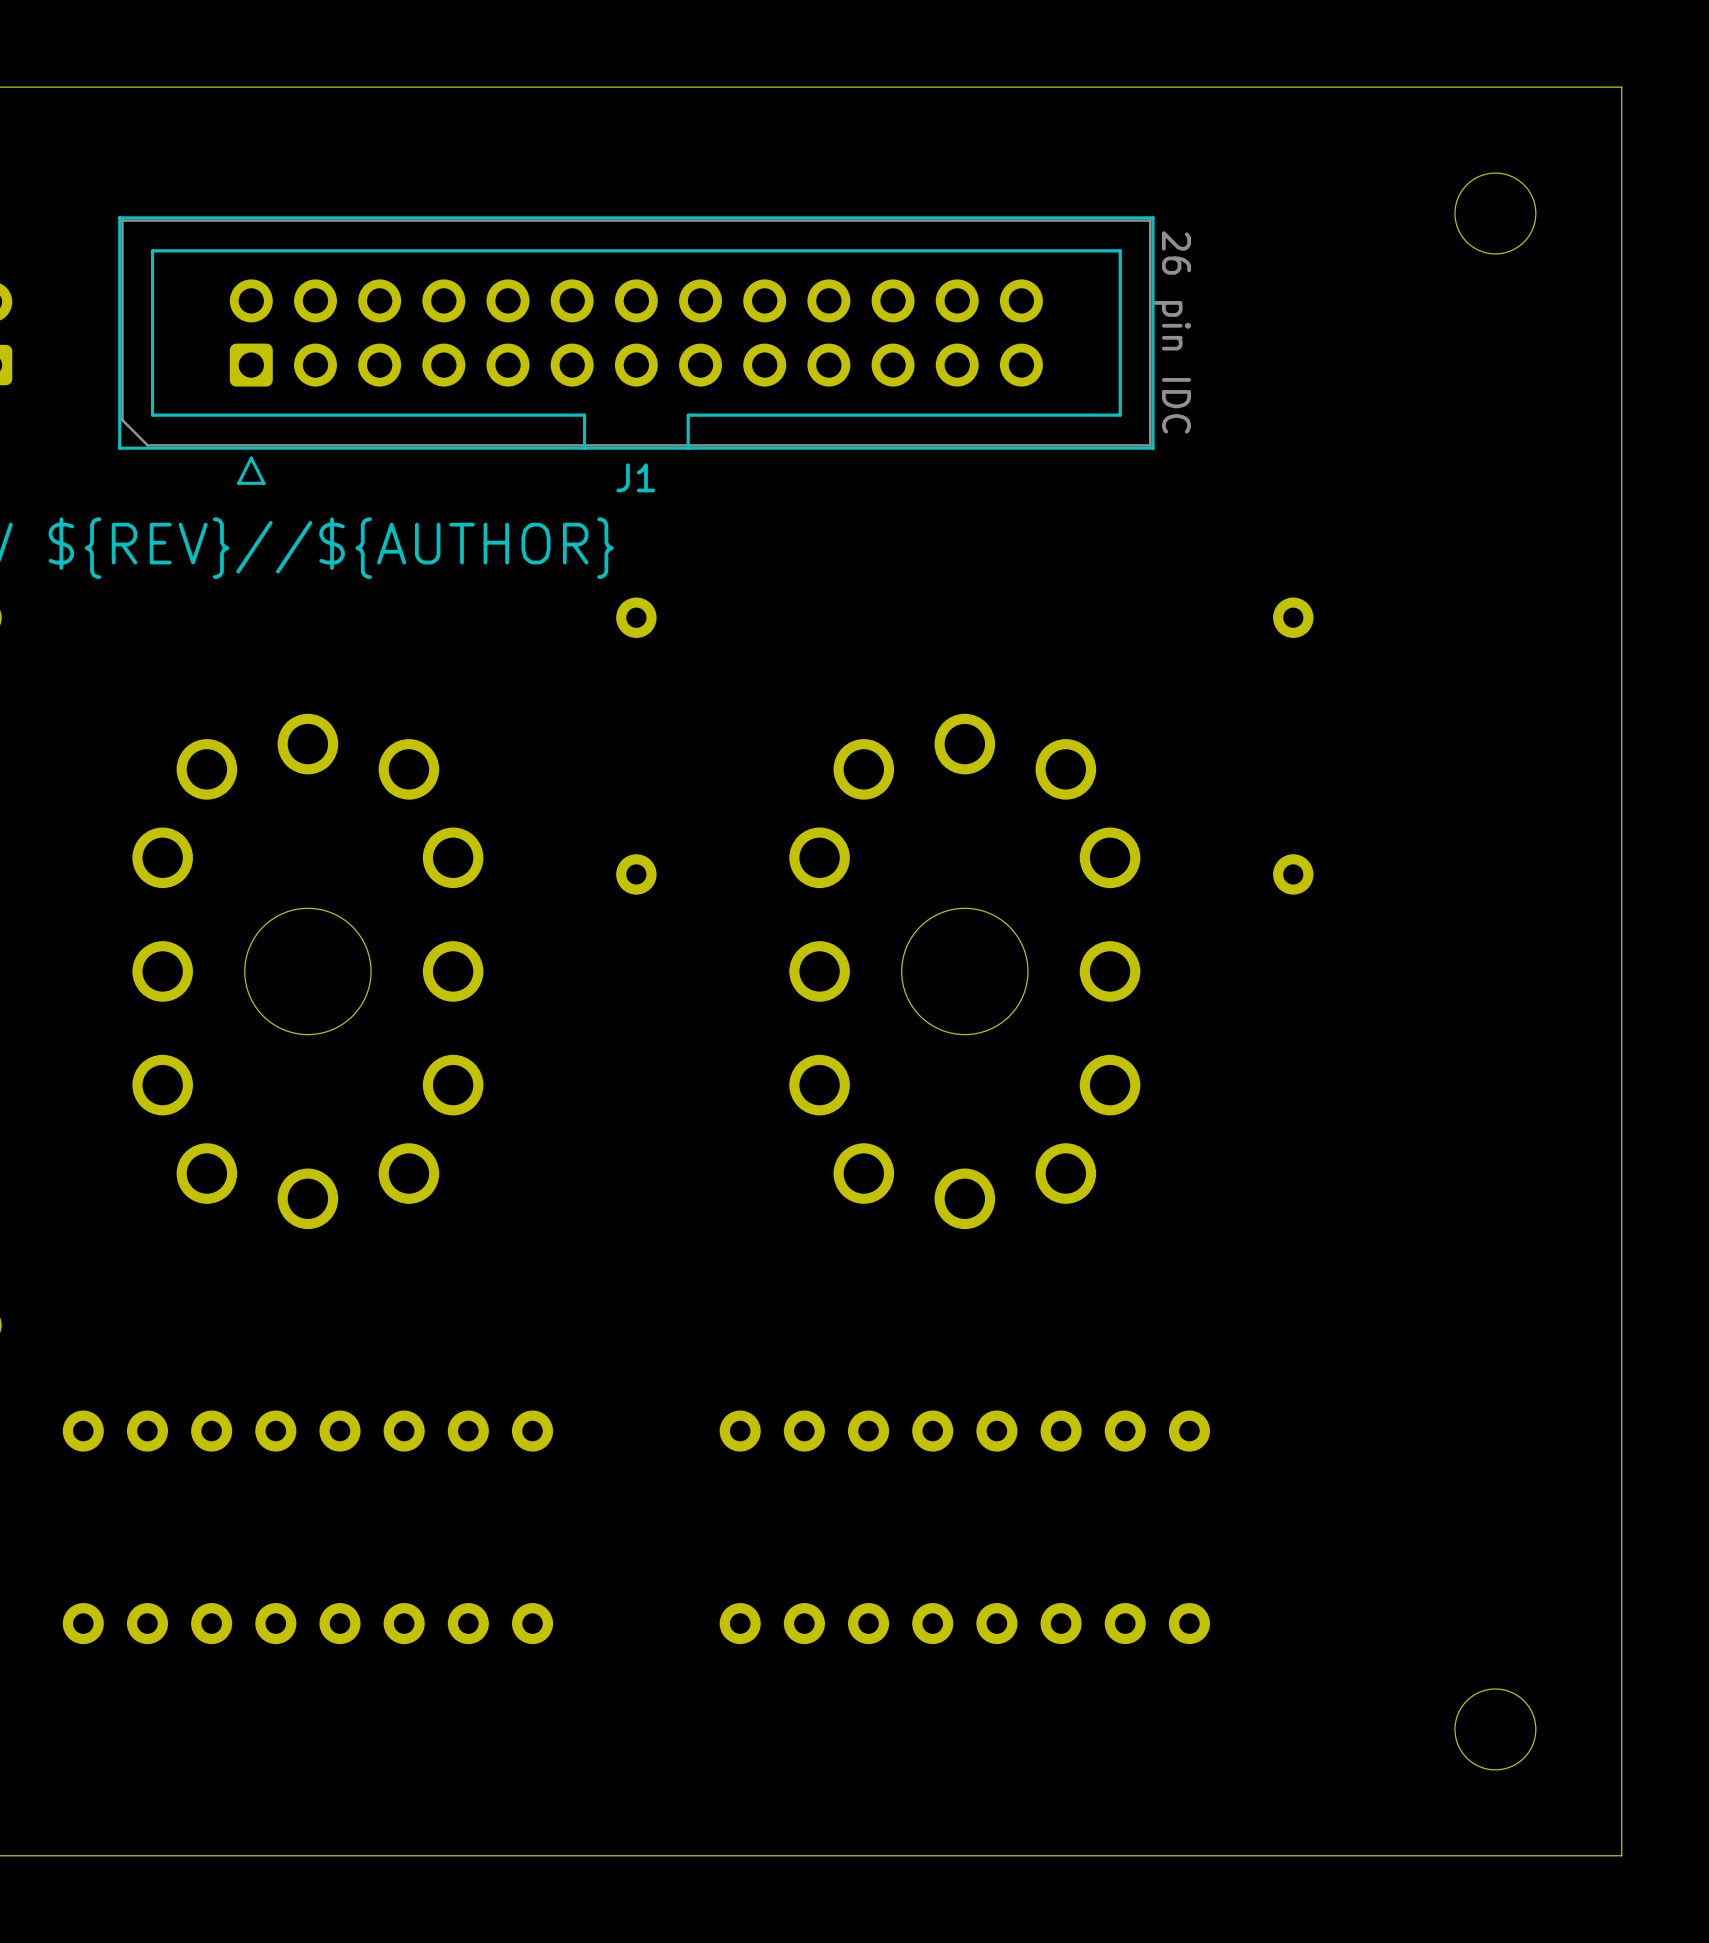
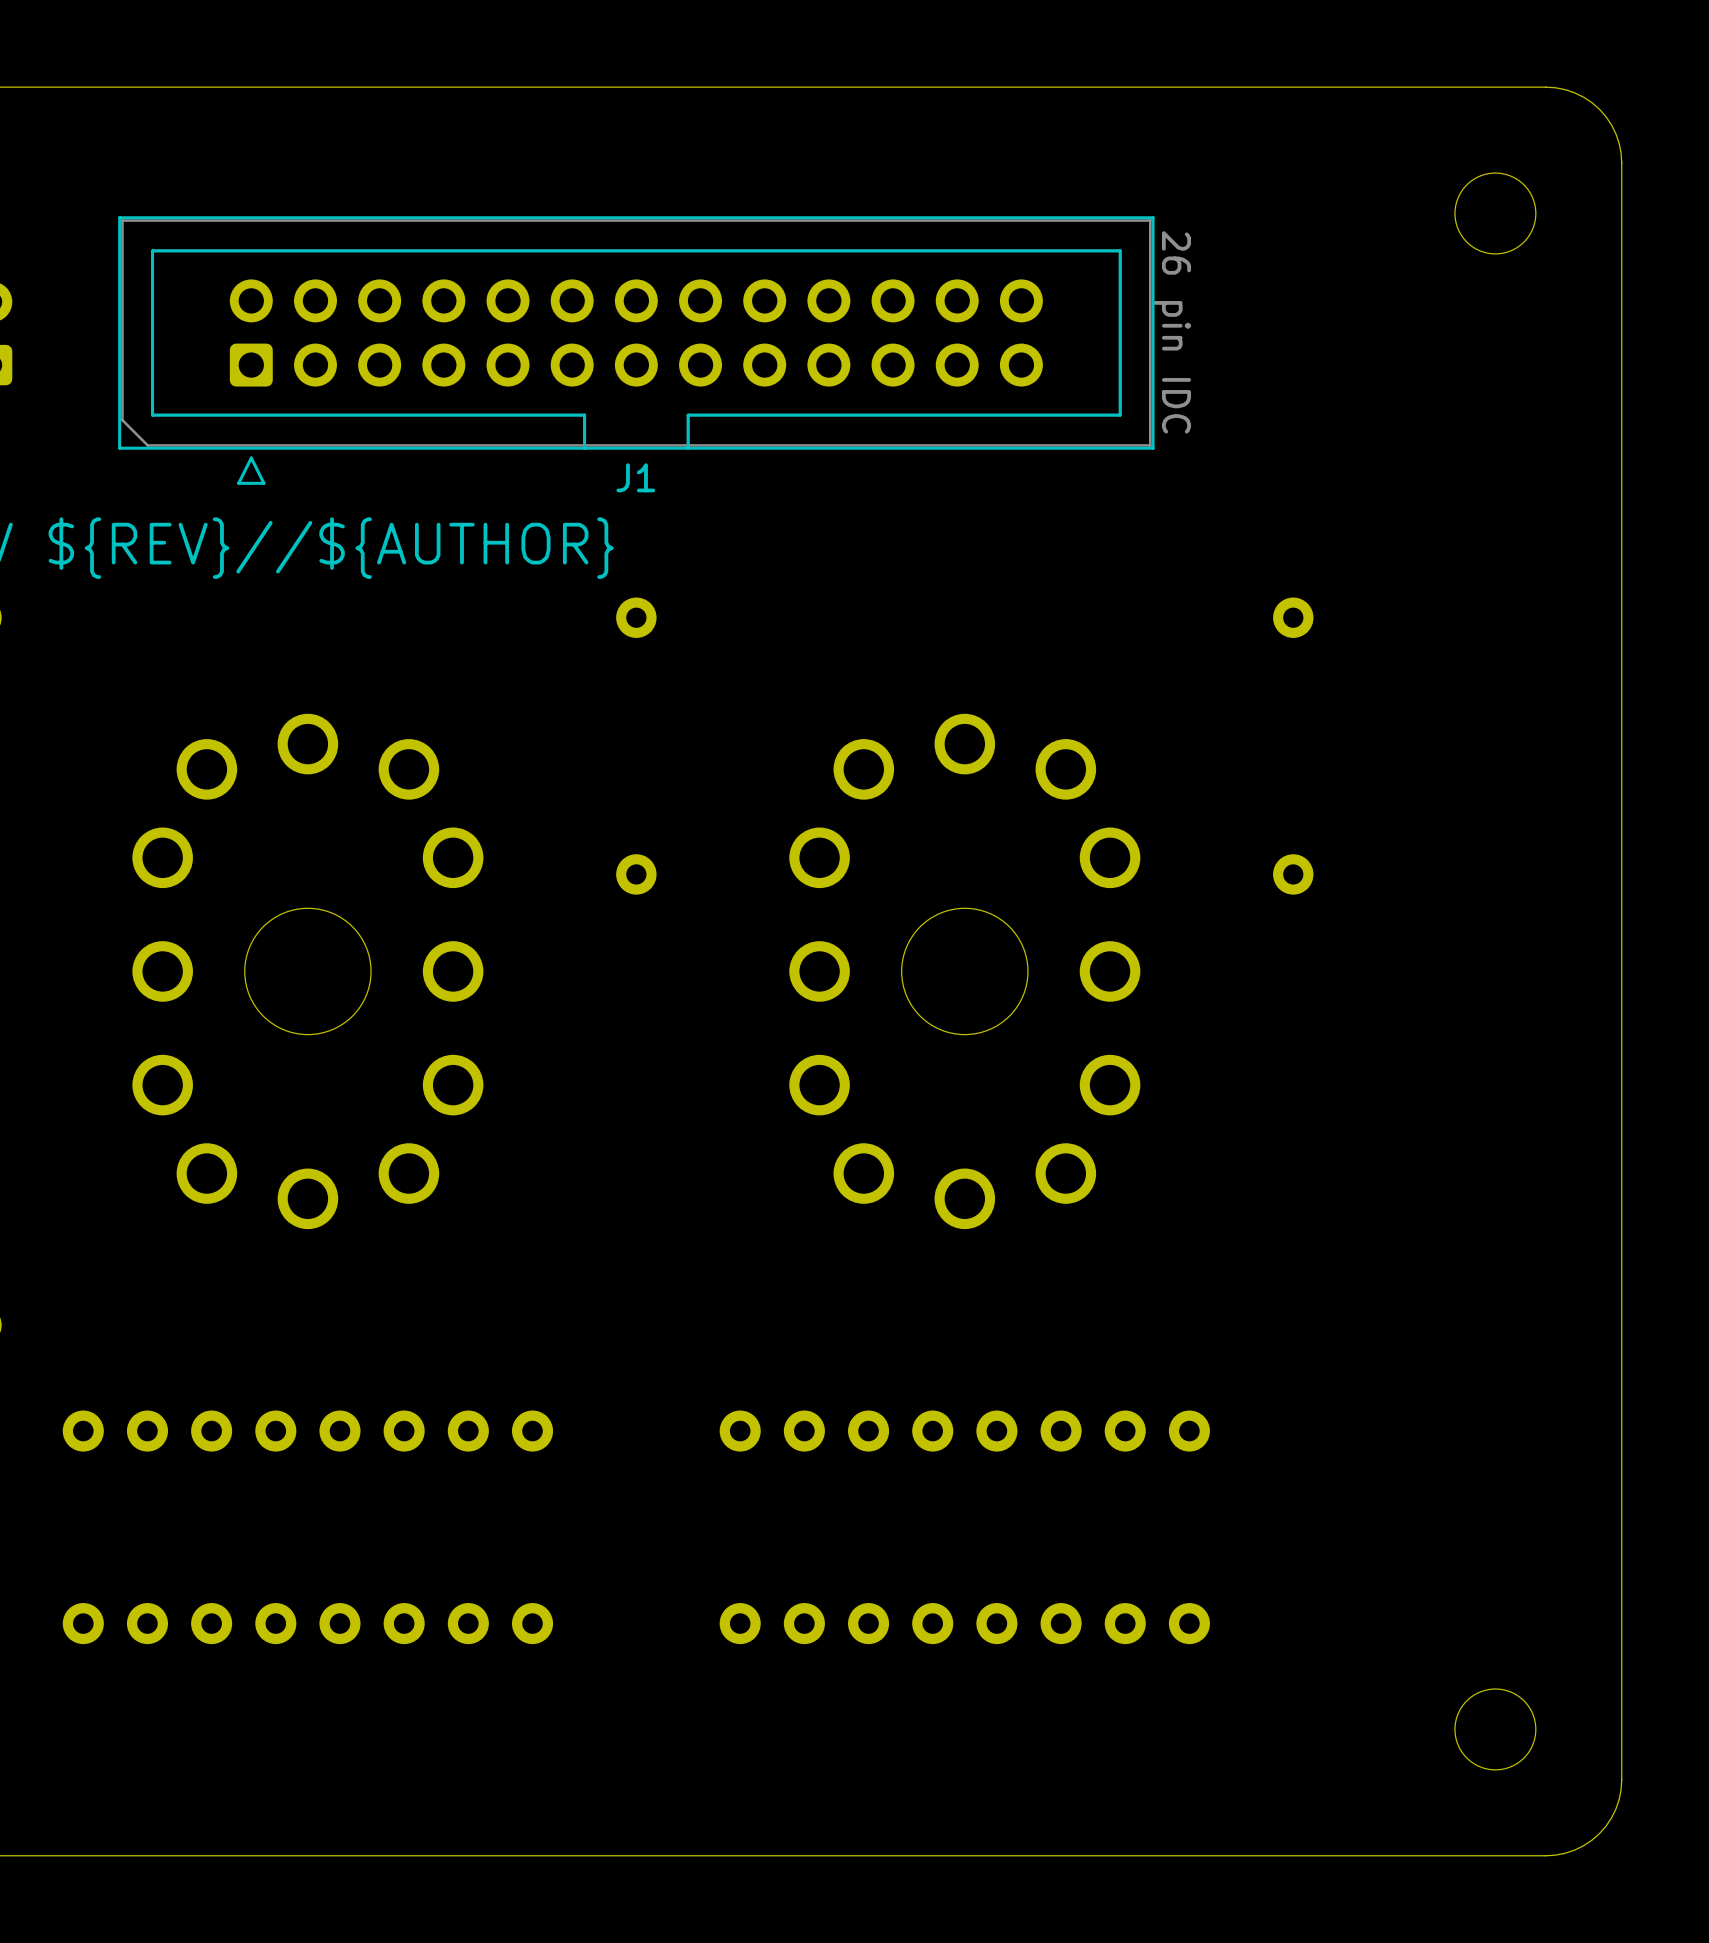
board edge: (1545, 87) (1621, 87) (1621, 162) -> (1545, 87) (1574, 92) (1599, 109) (1615, 133) (1621, 162)
board edge: (1621, 1779) (1621, 1855) (1545, 1855) -> (1621, 1779) (1615, 1808) (1599, 1833) (1574, 1849) (1545, 1855)

